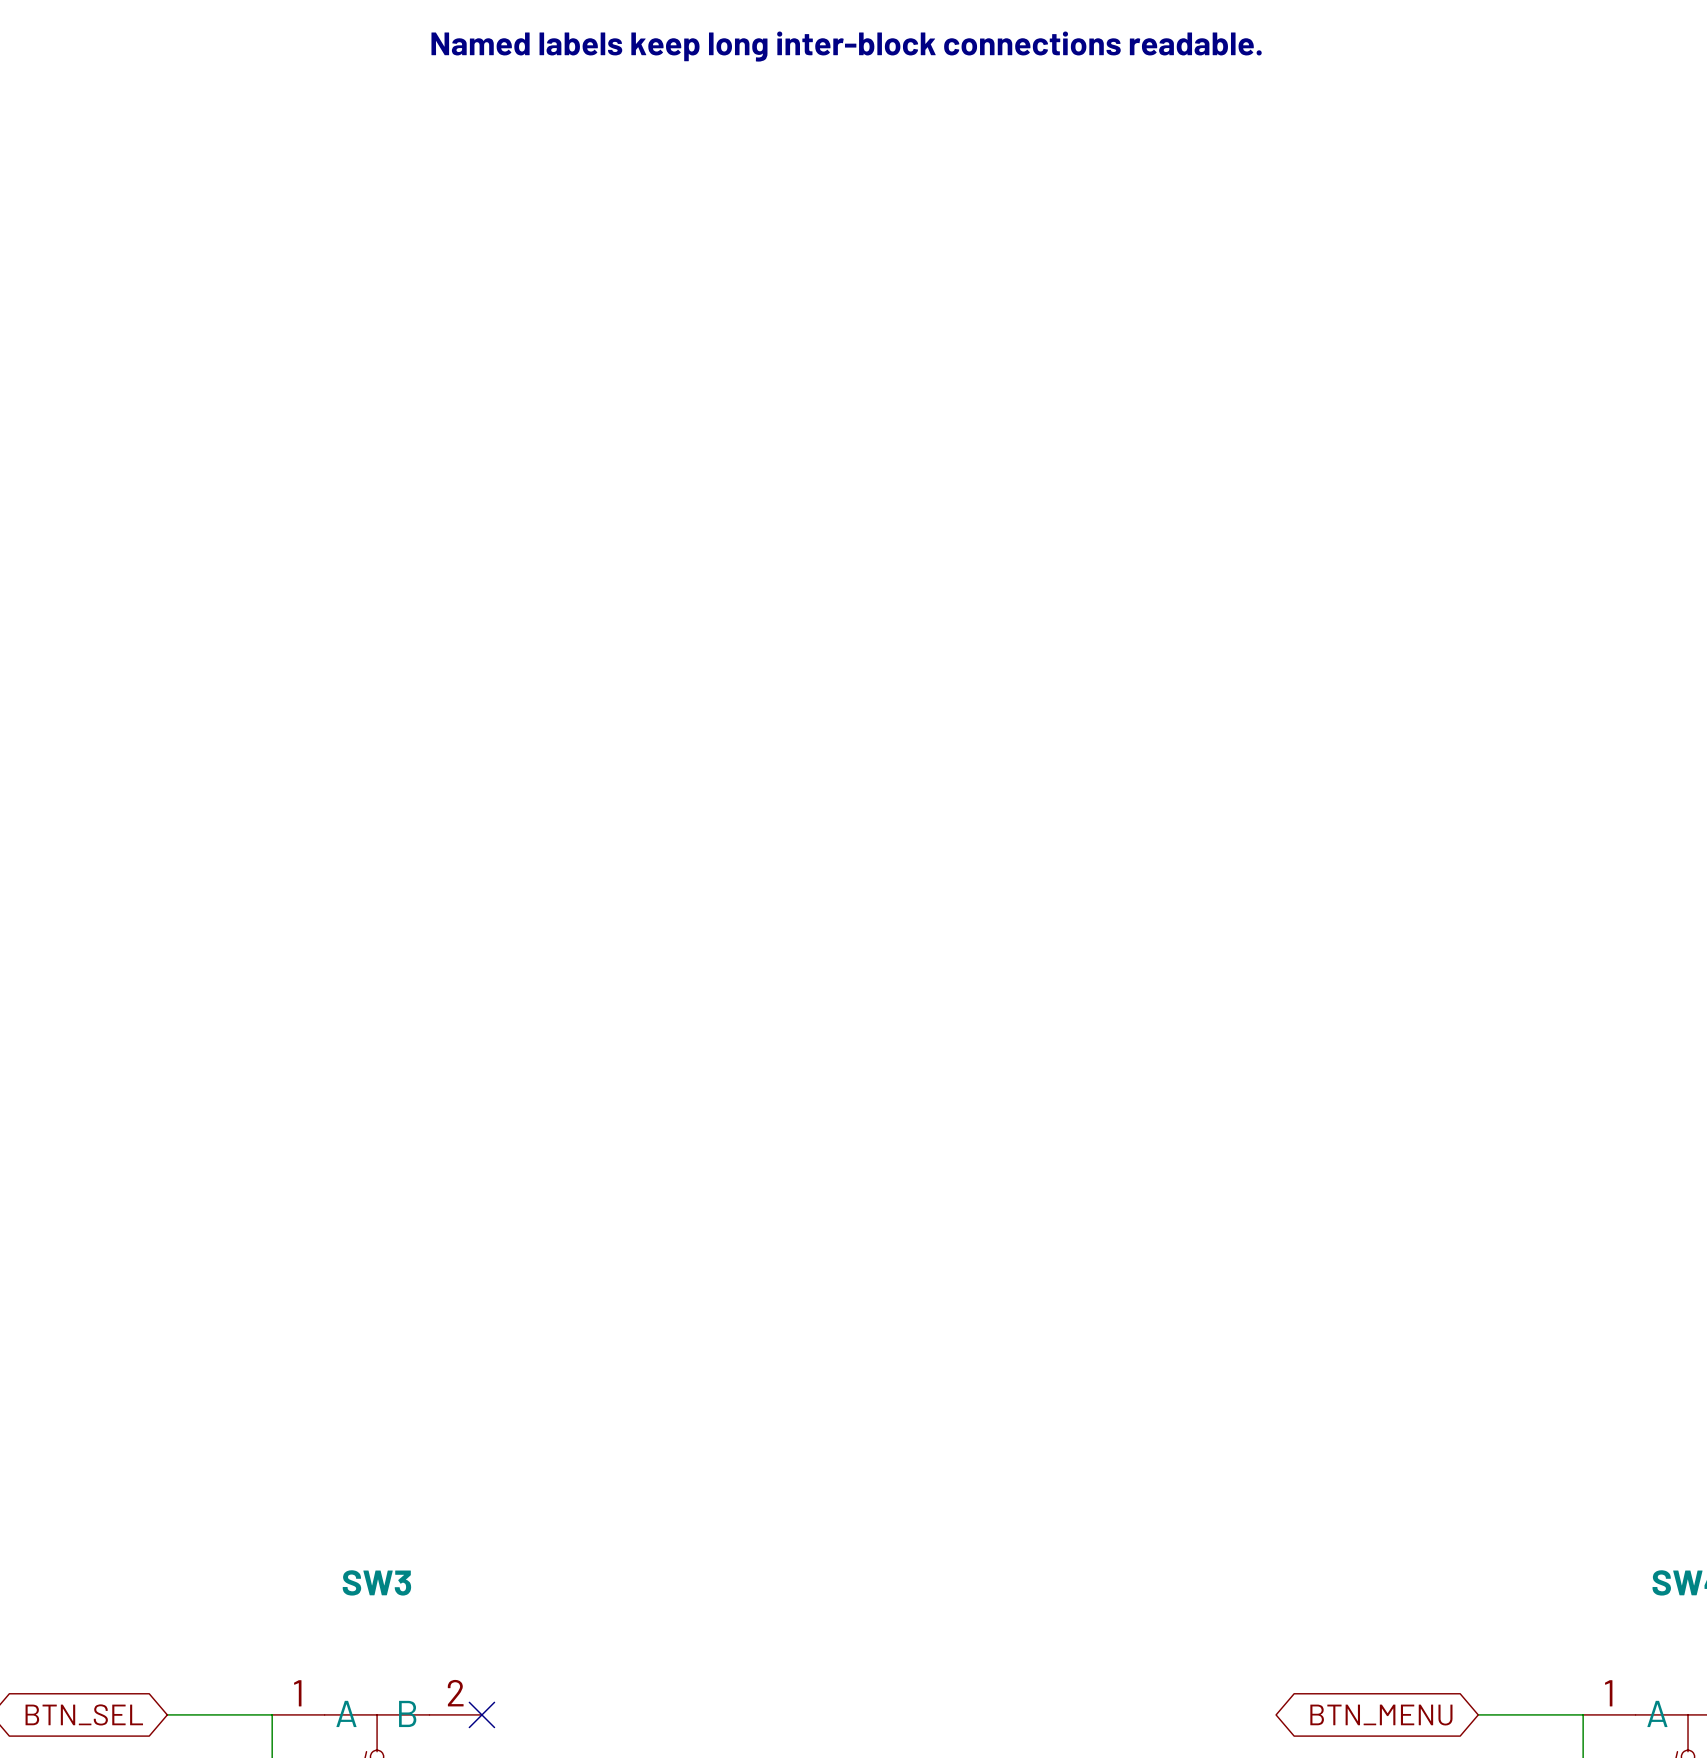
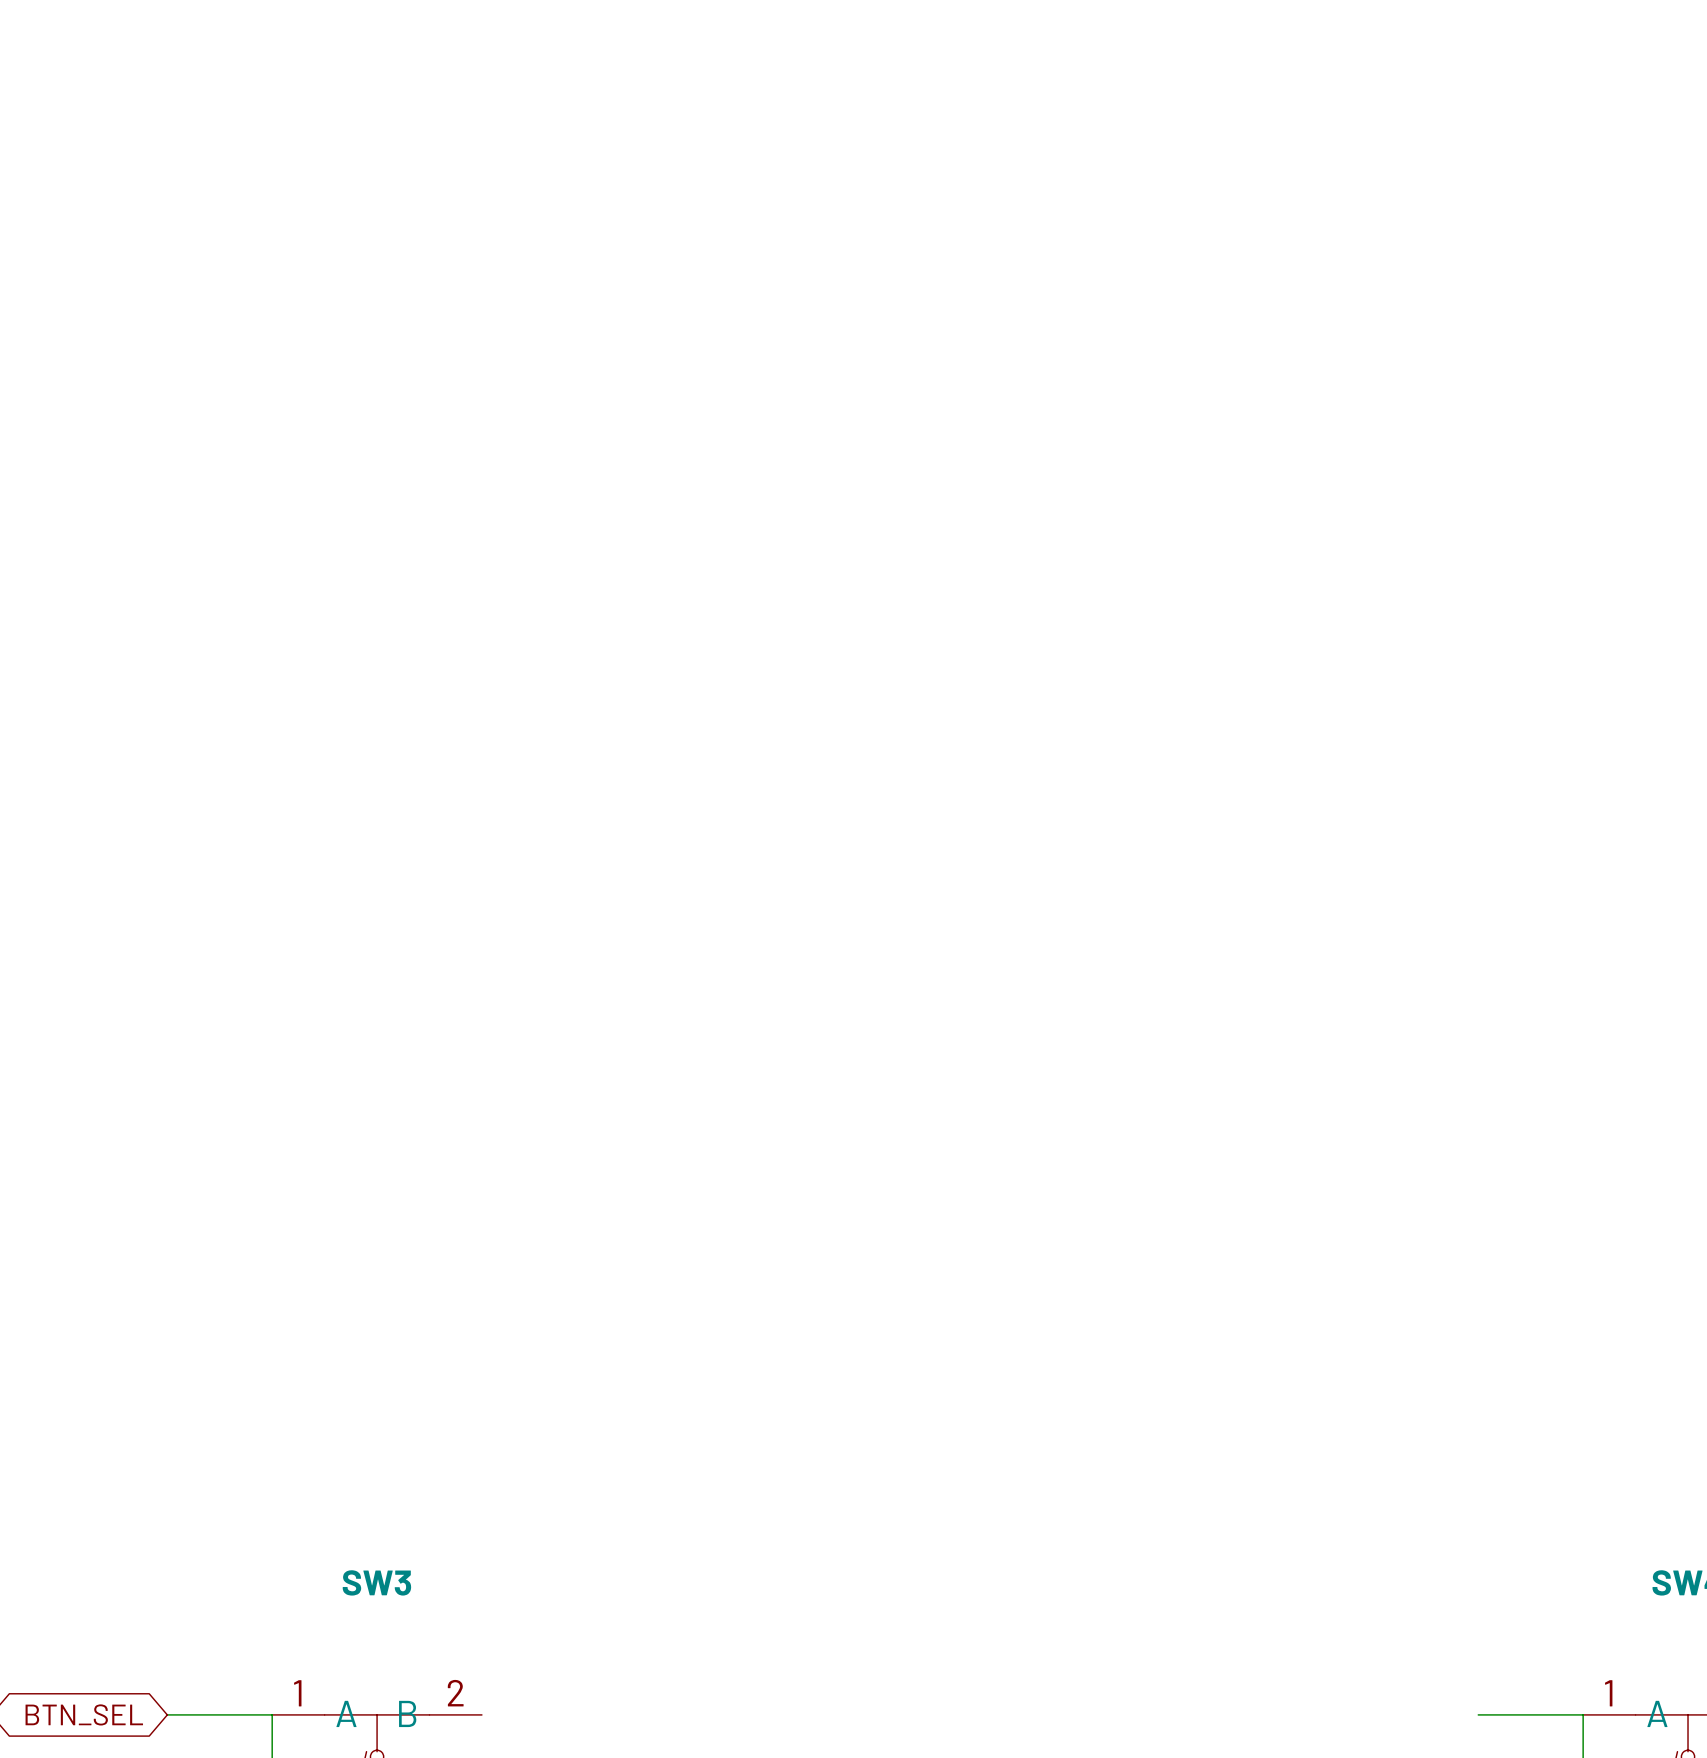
text: Named labels keep long inter-block connections readable. (846, 46) -> none
no-connect mark: (481, 1714) -> none
global label: BTN_MENU (1381, 1715) -> none

